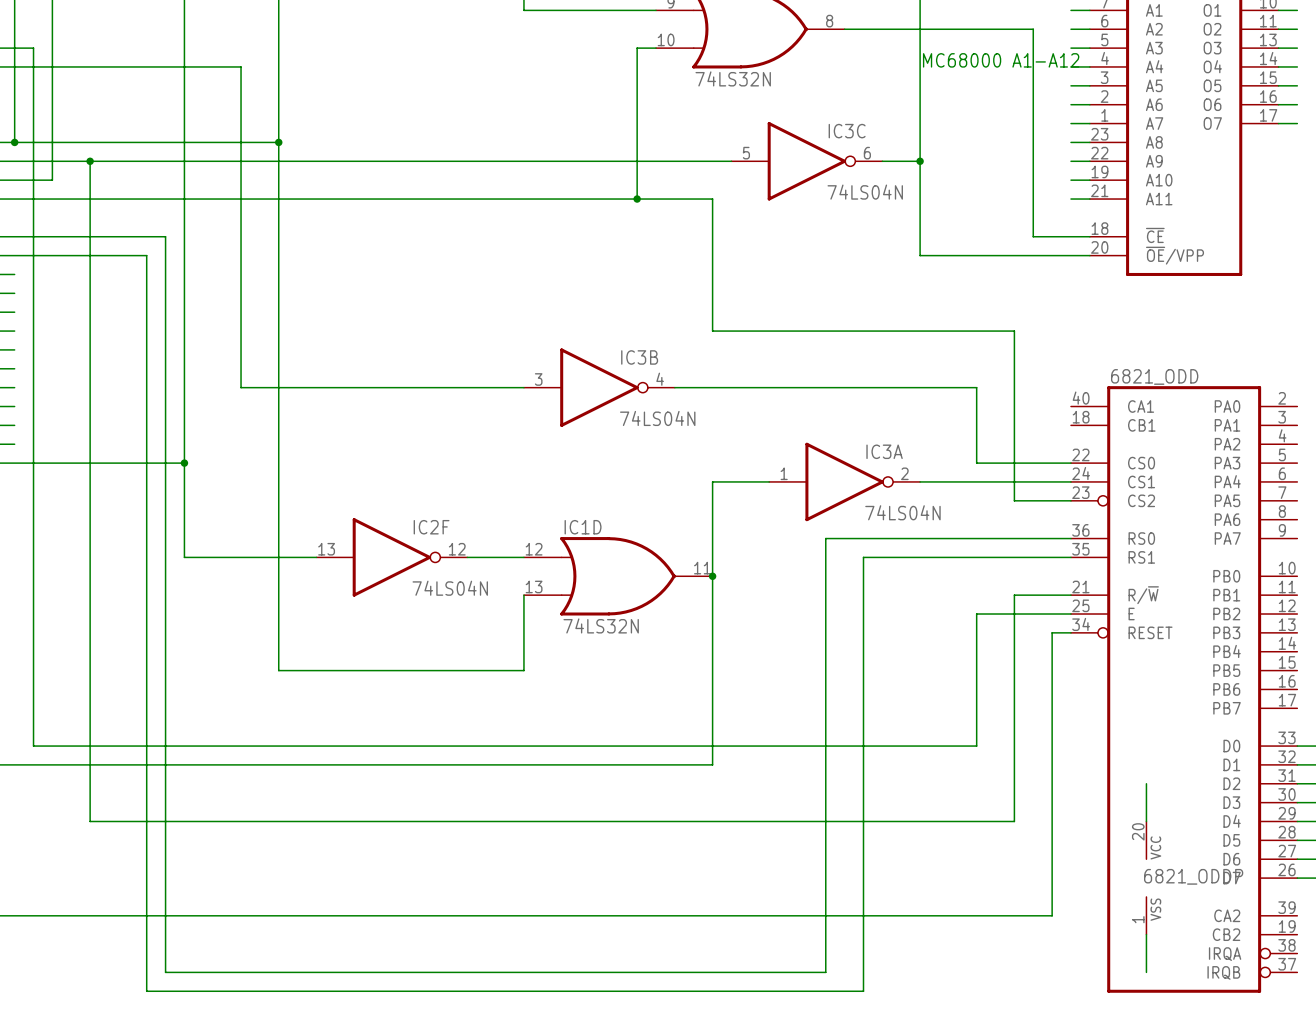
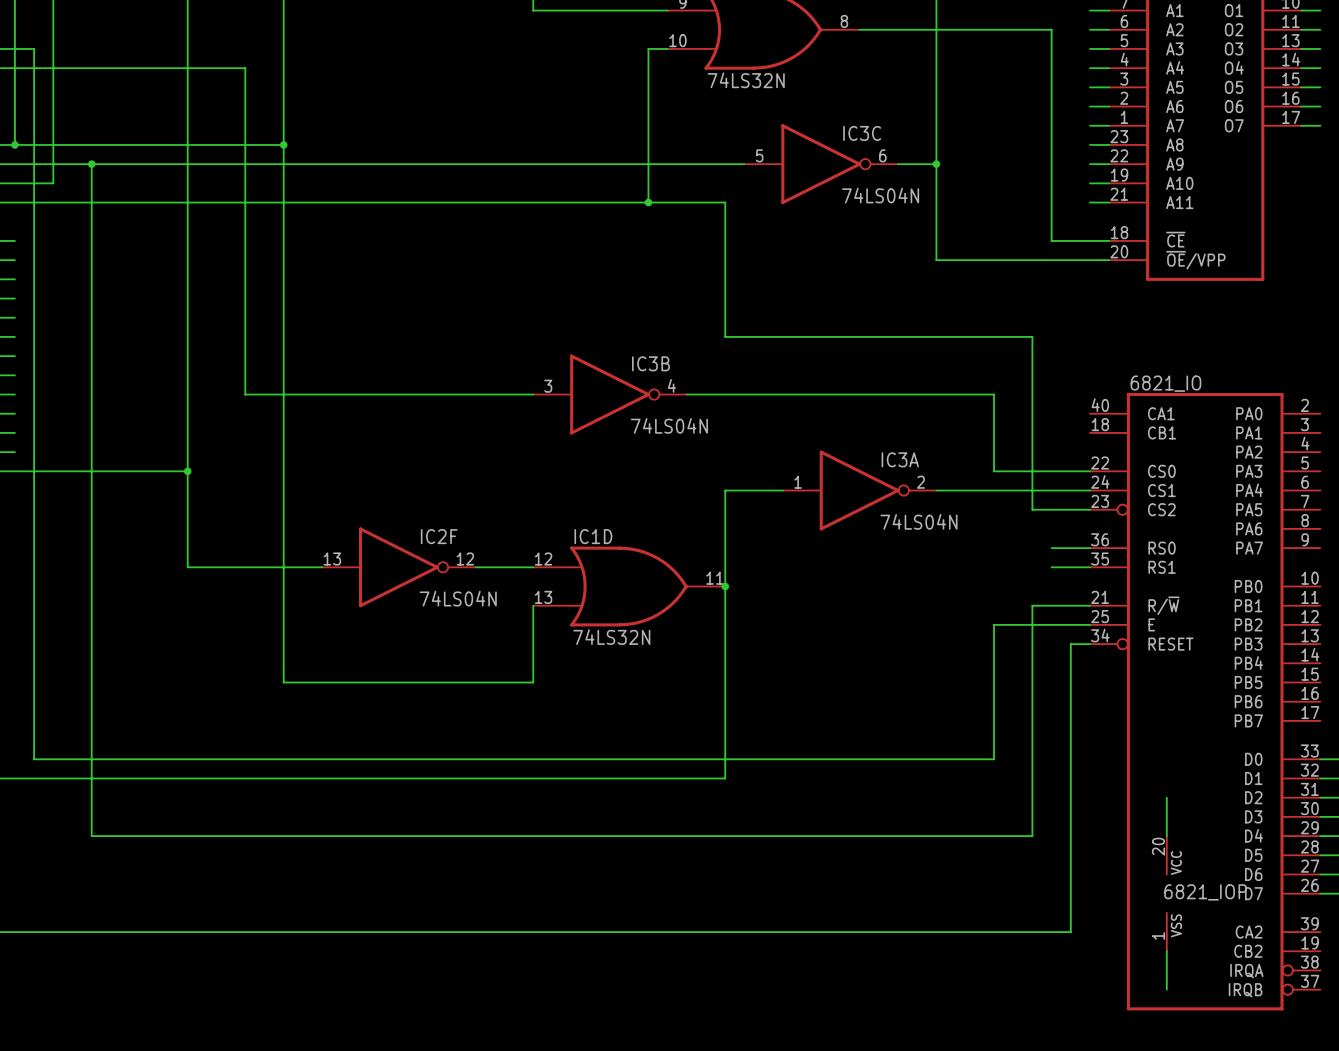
text: MC68000 A1-A12 (1001, 60) -> none
wire: (14, 236) (165, 236) (165, 972) (825, 972) (825, 538) (1033, 538) -> none
wire: (14, 255) (146, 255) (146, 991) (863, 991) (863, 557) (1033, 557) -> none
6821_ODD name: 6821_ODD (1154, 376) -> 6821_IO (1165, 383)
6821_ODDP name: 6821_ODDP (1193, 876) -> 6821_IOP (1205, 892)

